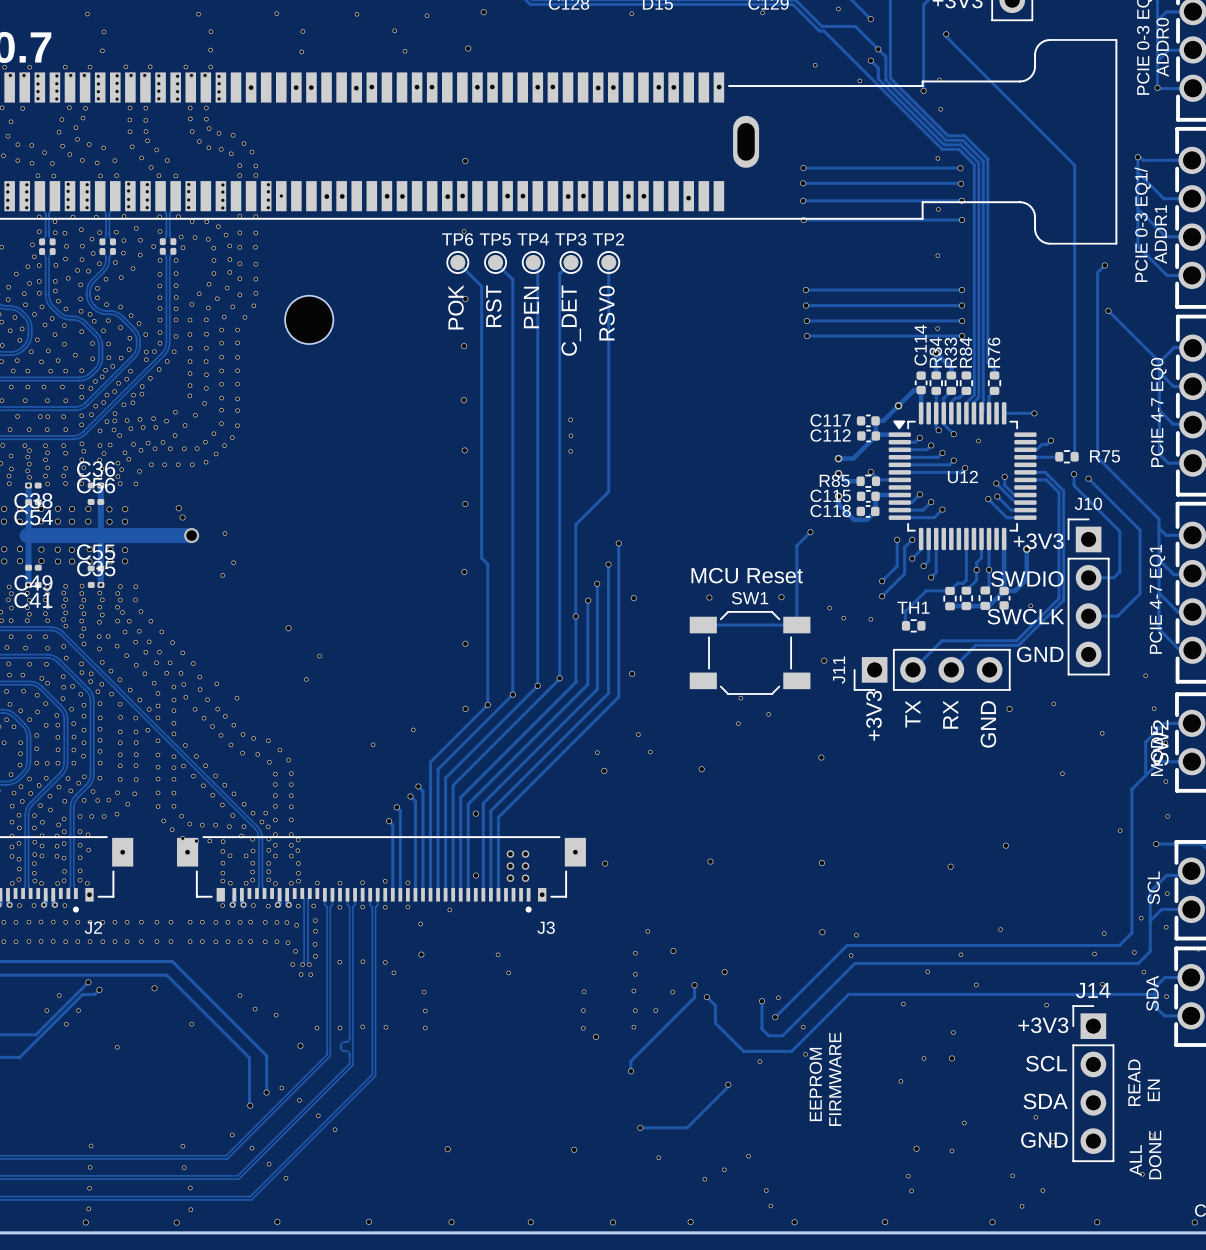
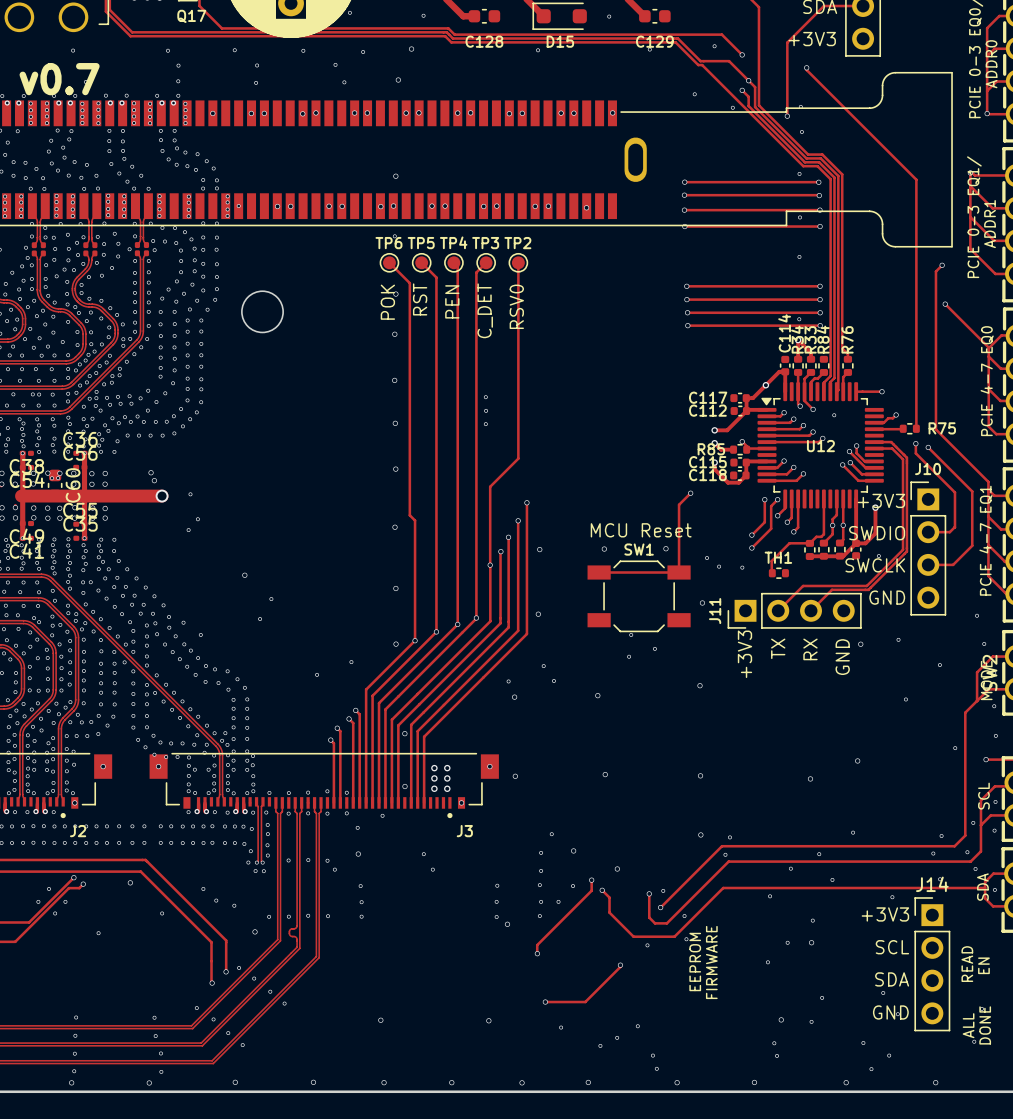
via: none -> (51, 478)
via: none -> (58, 478)
via: (57, 521) -> none
via: (71, 521) -> none
C60: none -> (55, 485)

